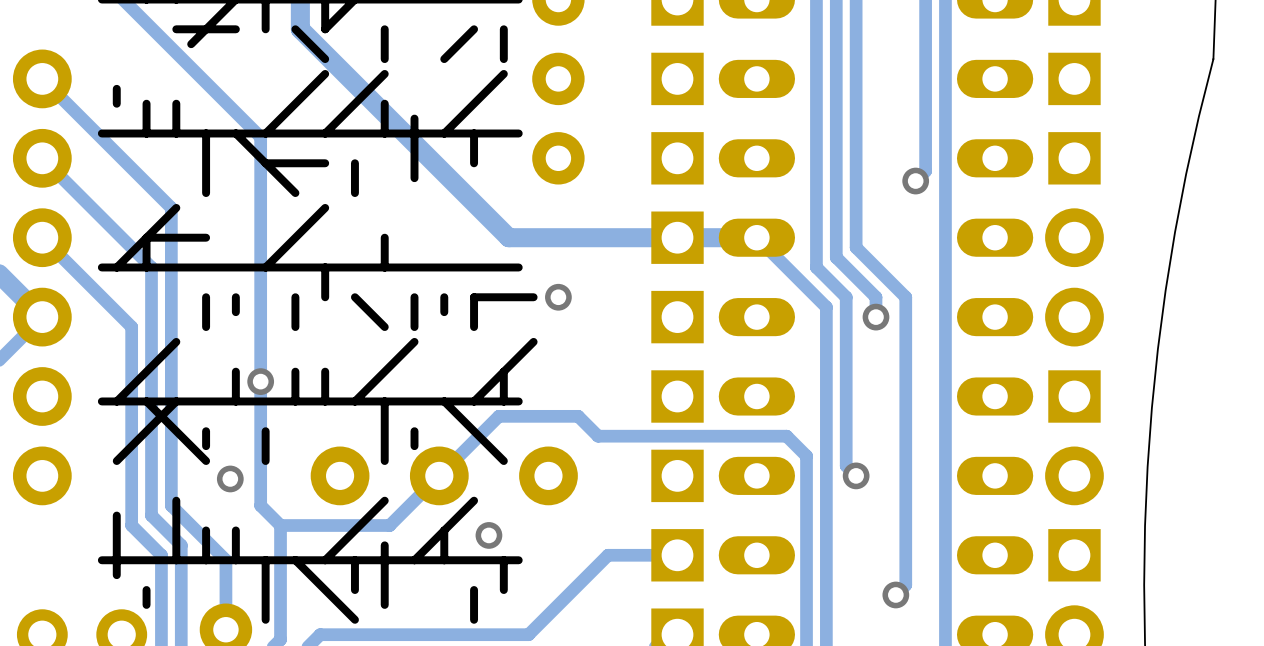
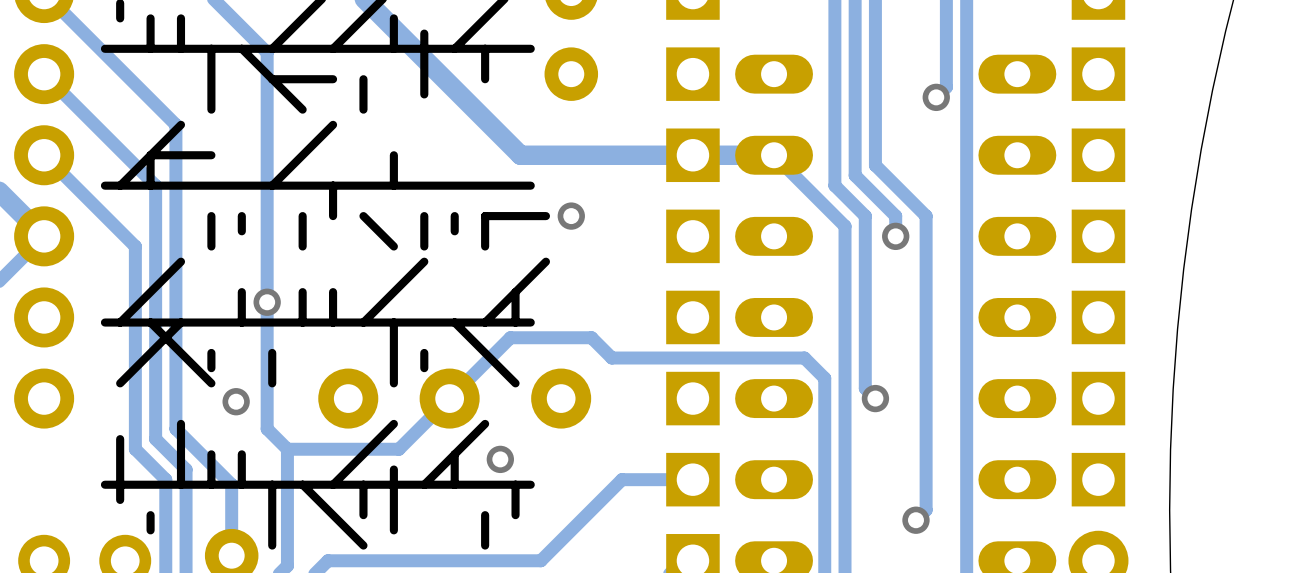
part footprint: [1045, 208, 1104, 268] -> [1071, 128, 1126, 183]
part footprint: [1045, 287, 1104, 347] -> [1071, 209, 1126, 264]
part footprint: [1045, 446, 1104, 506] -> [1071, 371, 1126, 426]

